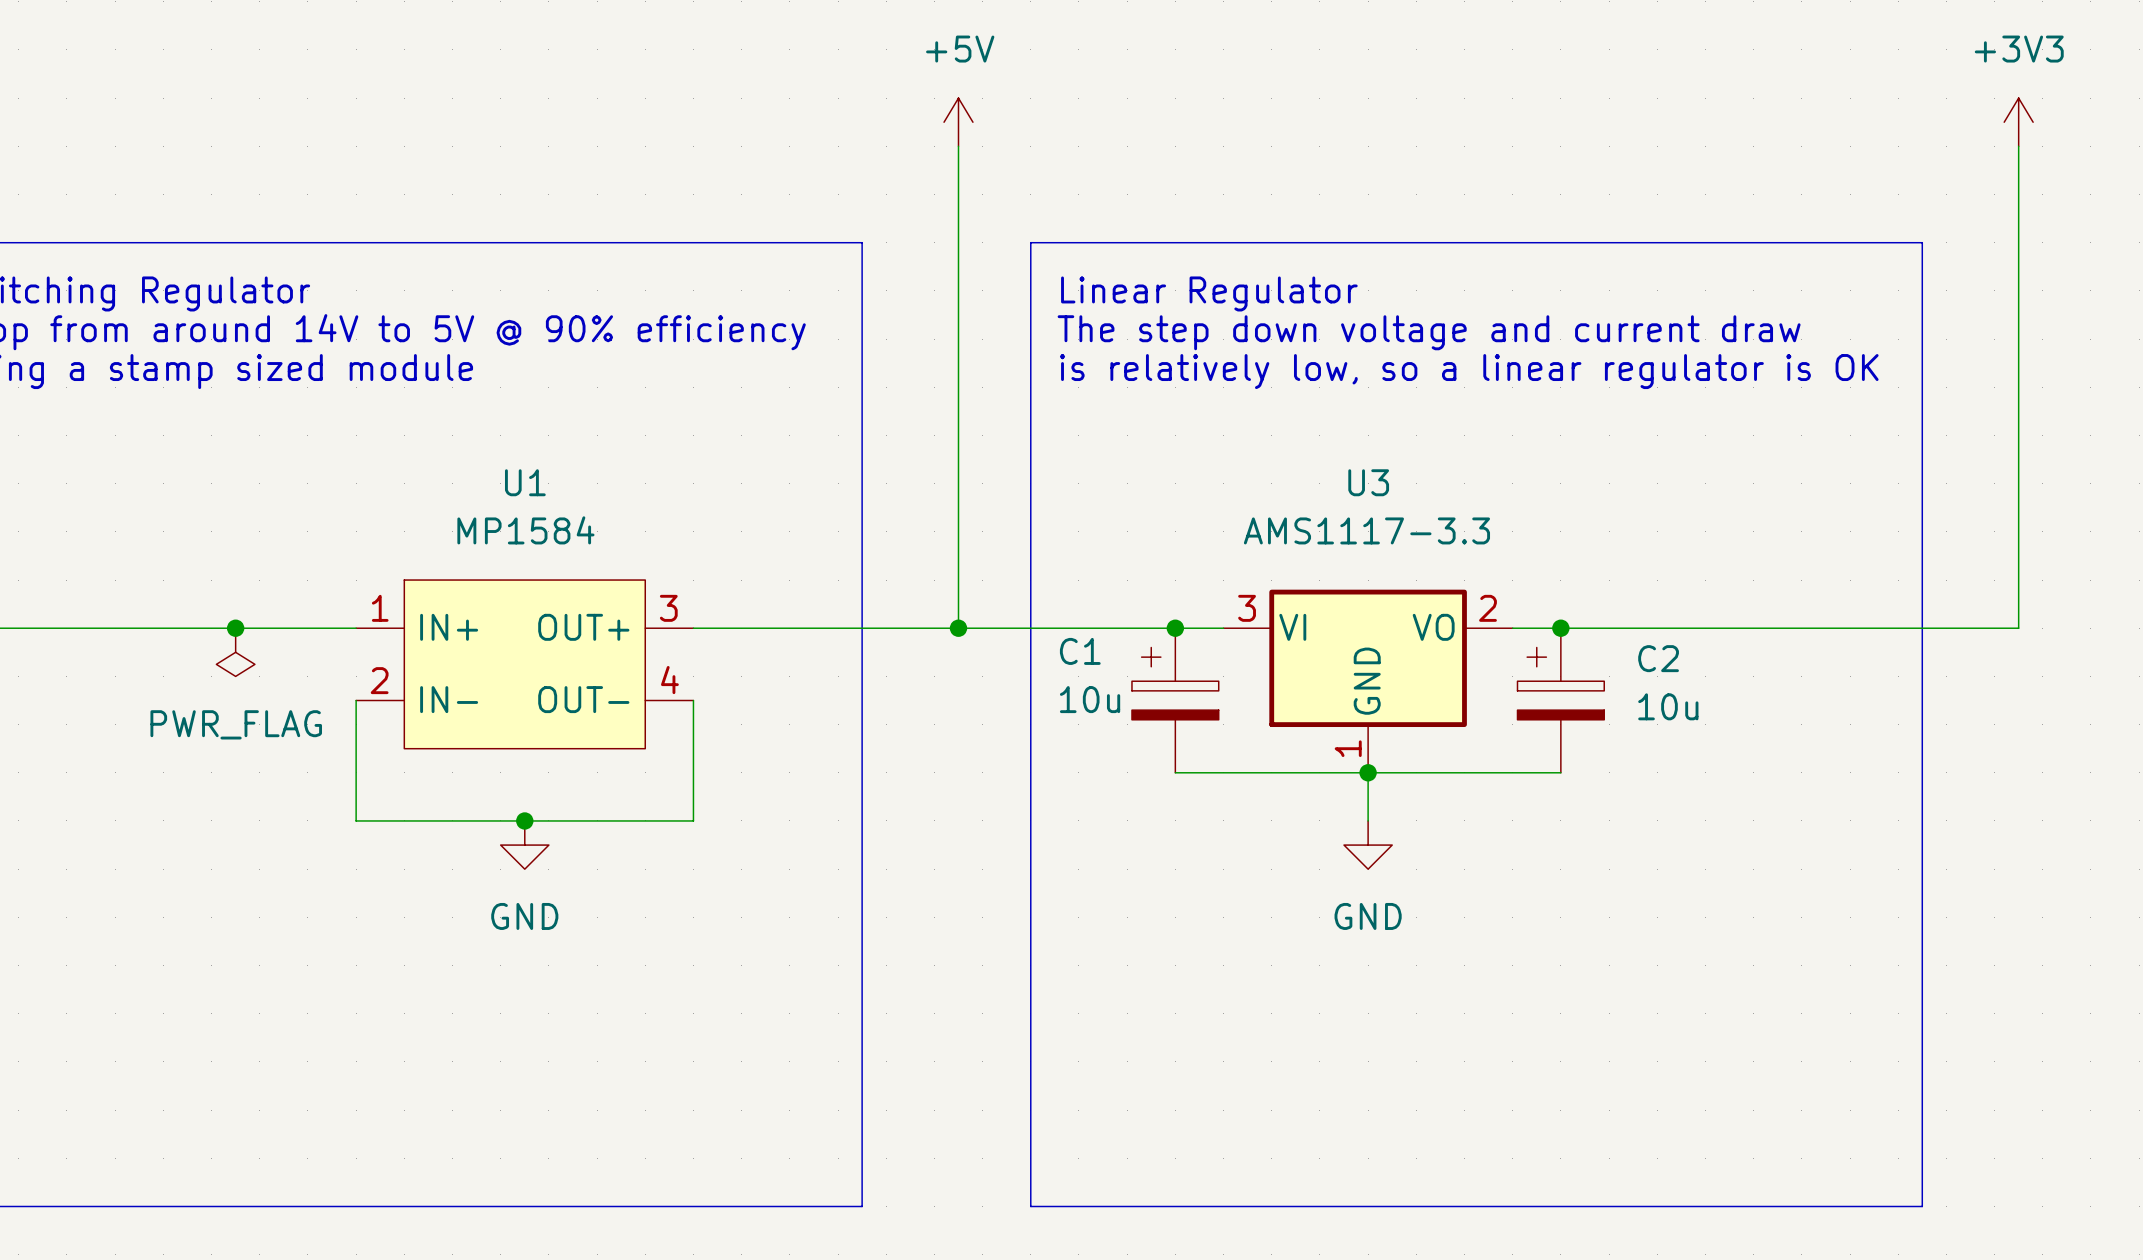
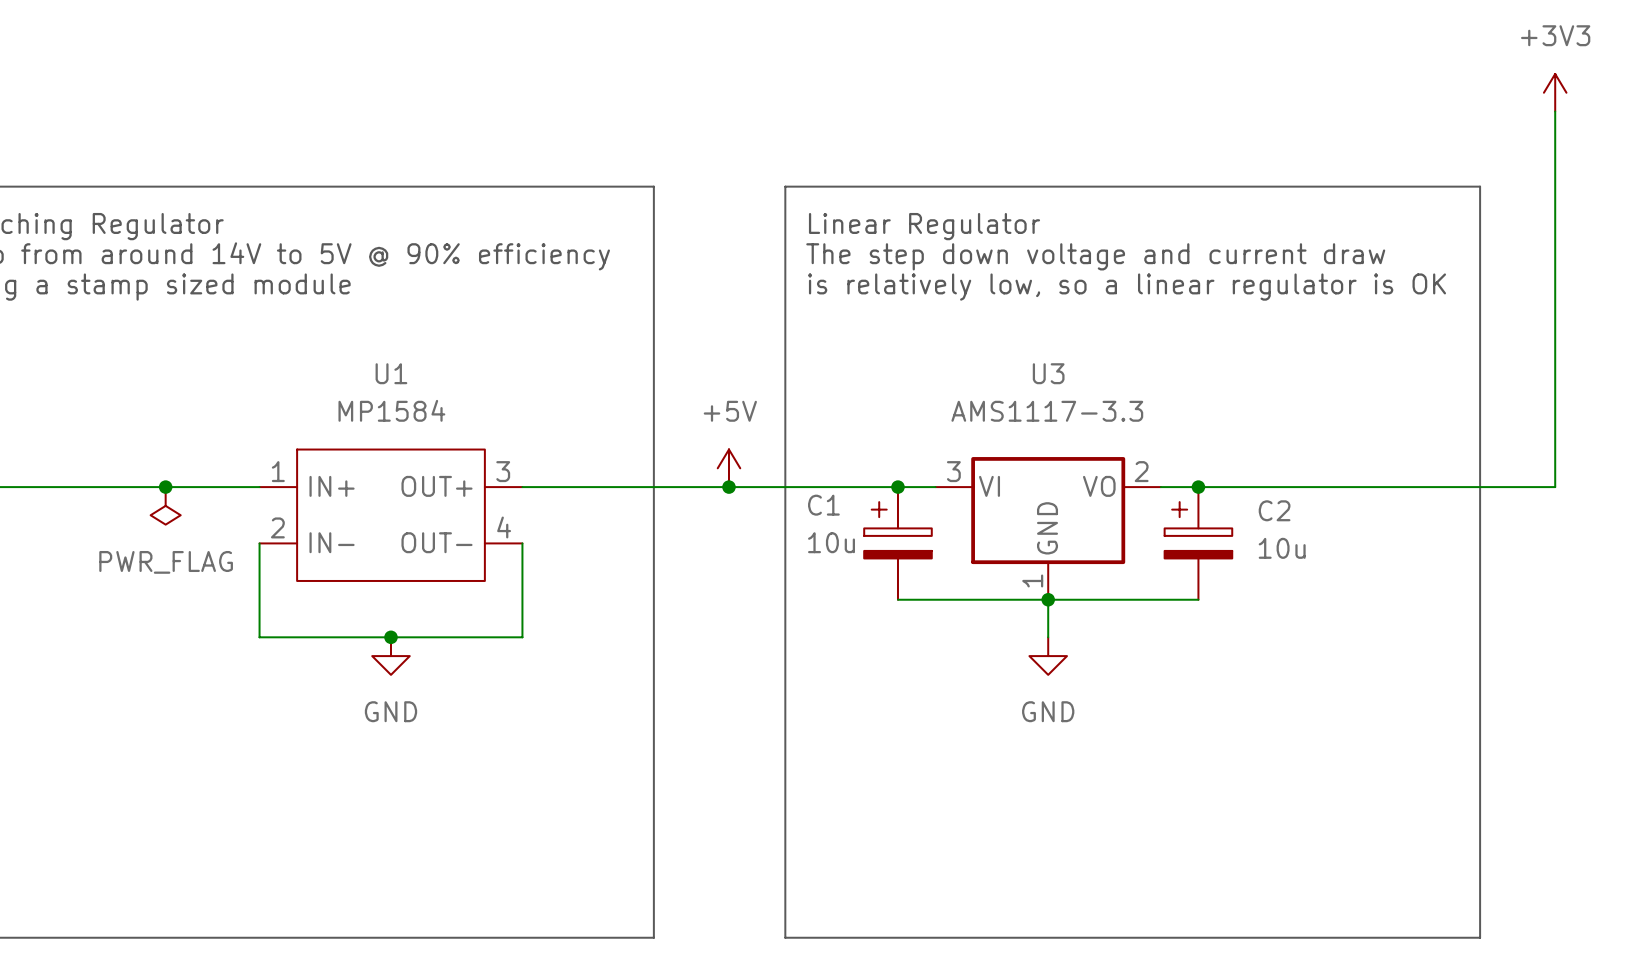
power symbol: +5V (958, 122) -> none
wire: (958, 146) (958, 628) -> none
power symbol: none -> +5V (728, 468)

